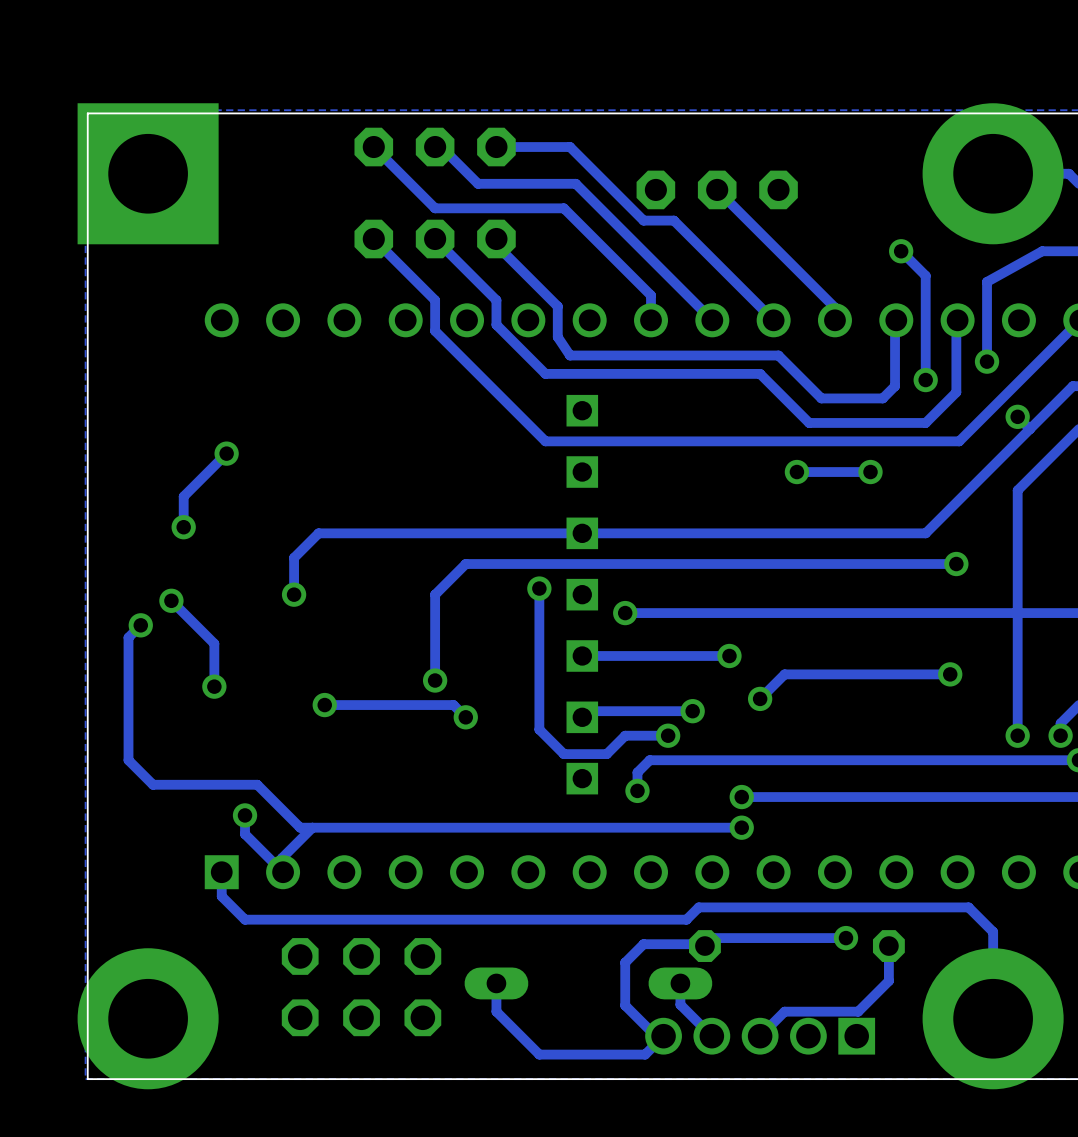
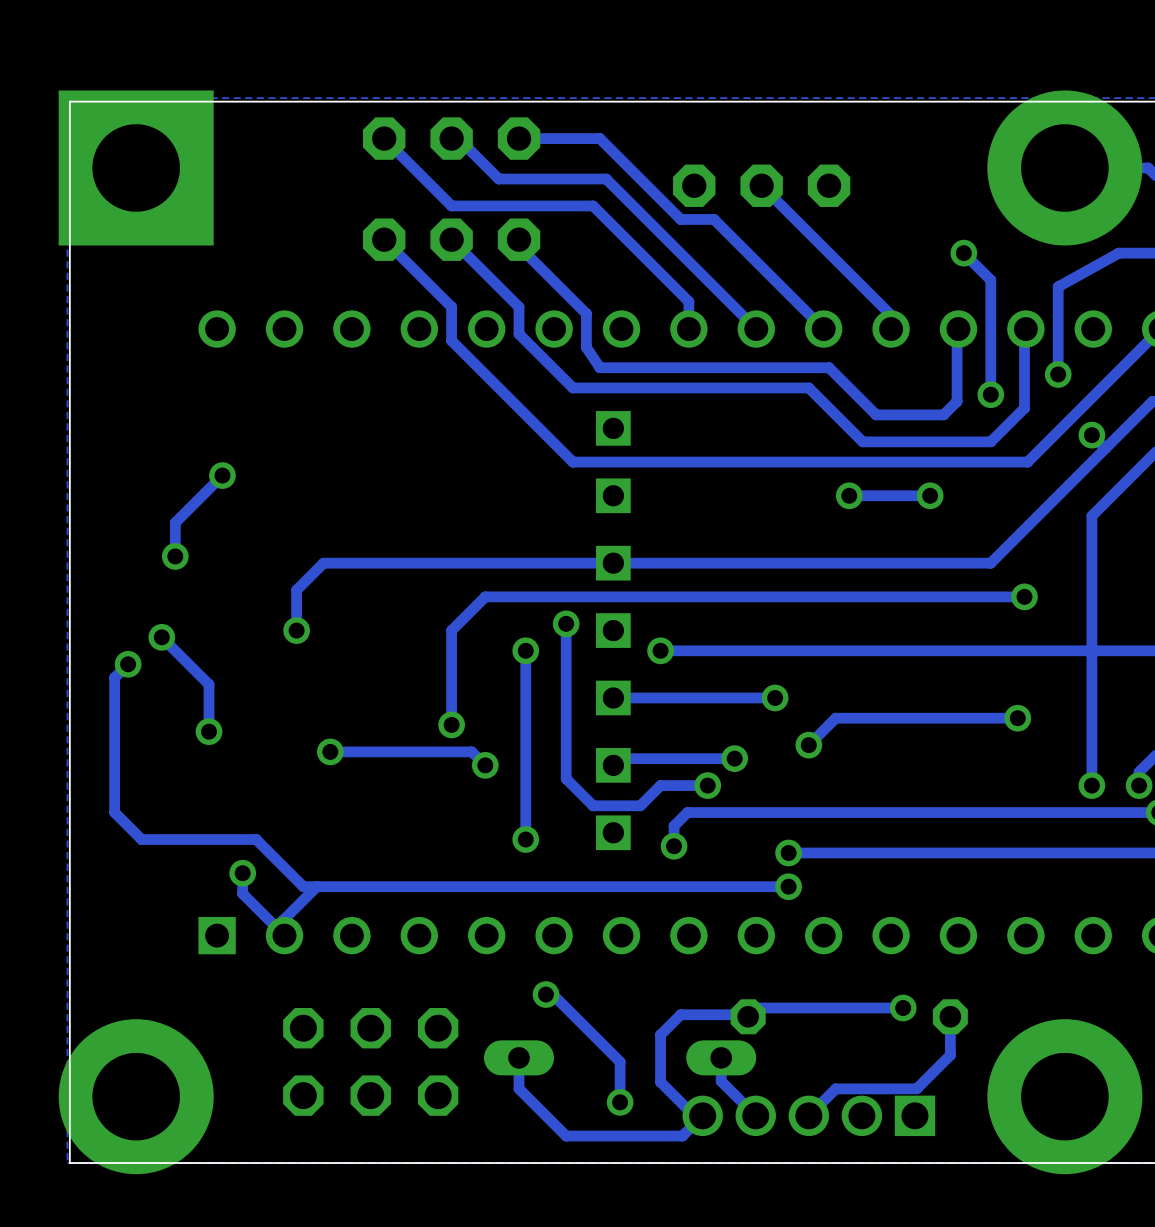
track: none -> (525, 650) (525, 839)
via: none -> (525, 650)
via: none -> (525, 839)
track: (221, 872) (221, 896) (245, 919) (686, 919) (698, 907) (968, 907) (993, 931) (993, 1018) -> none
track: none -> (545, 994) (552, 994) (620, 1061) (620, 1102)
via: none -> (545, 994)
via: none -> (620, 1102)

